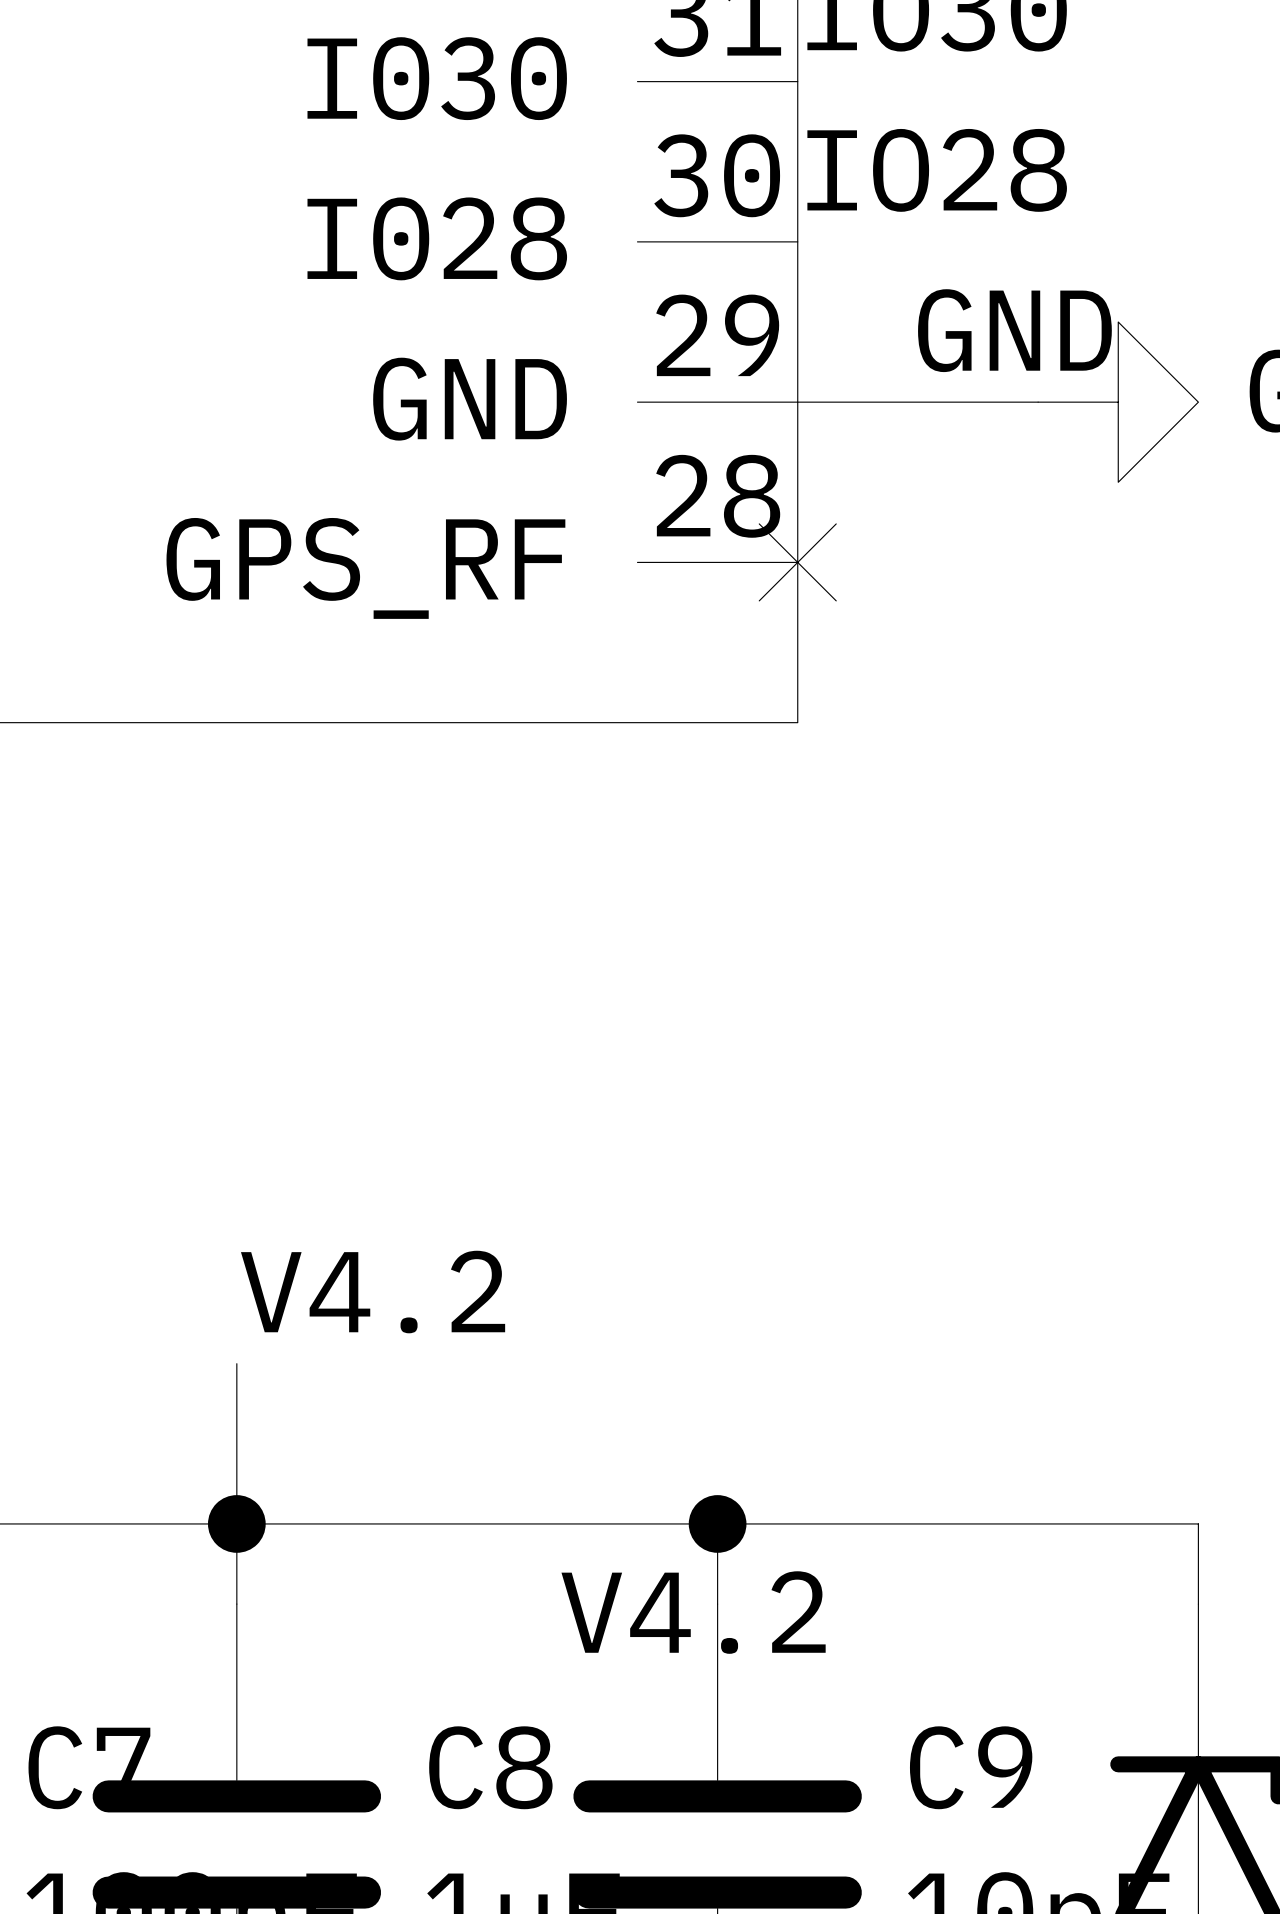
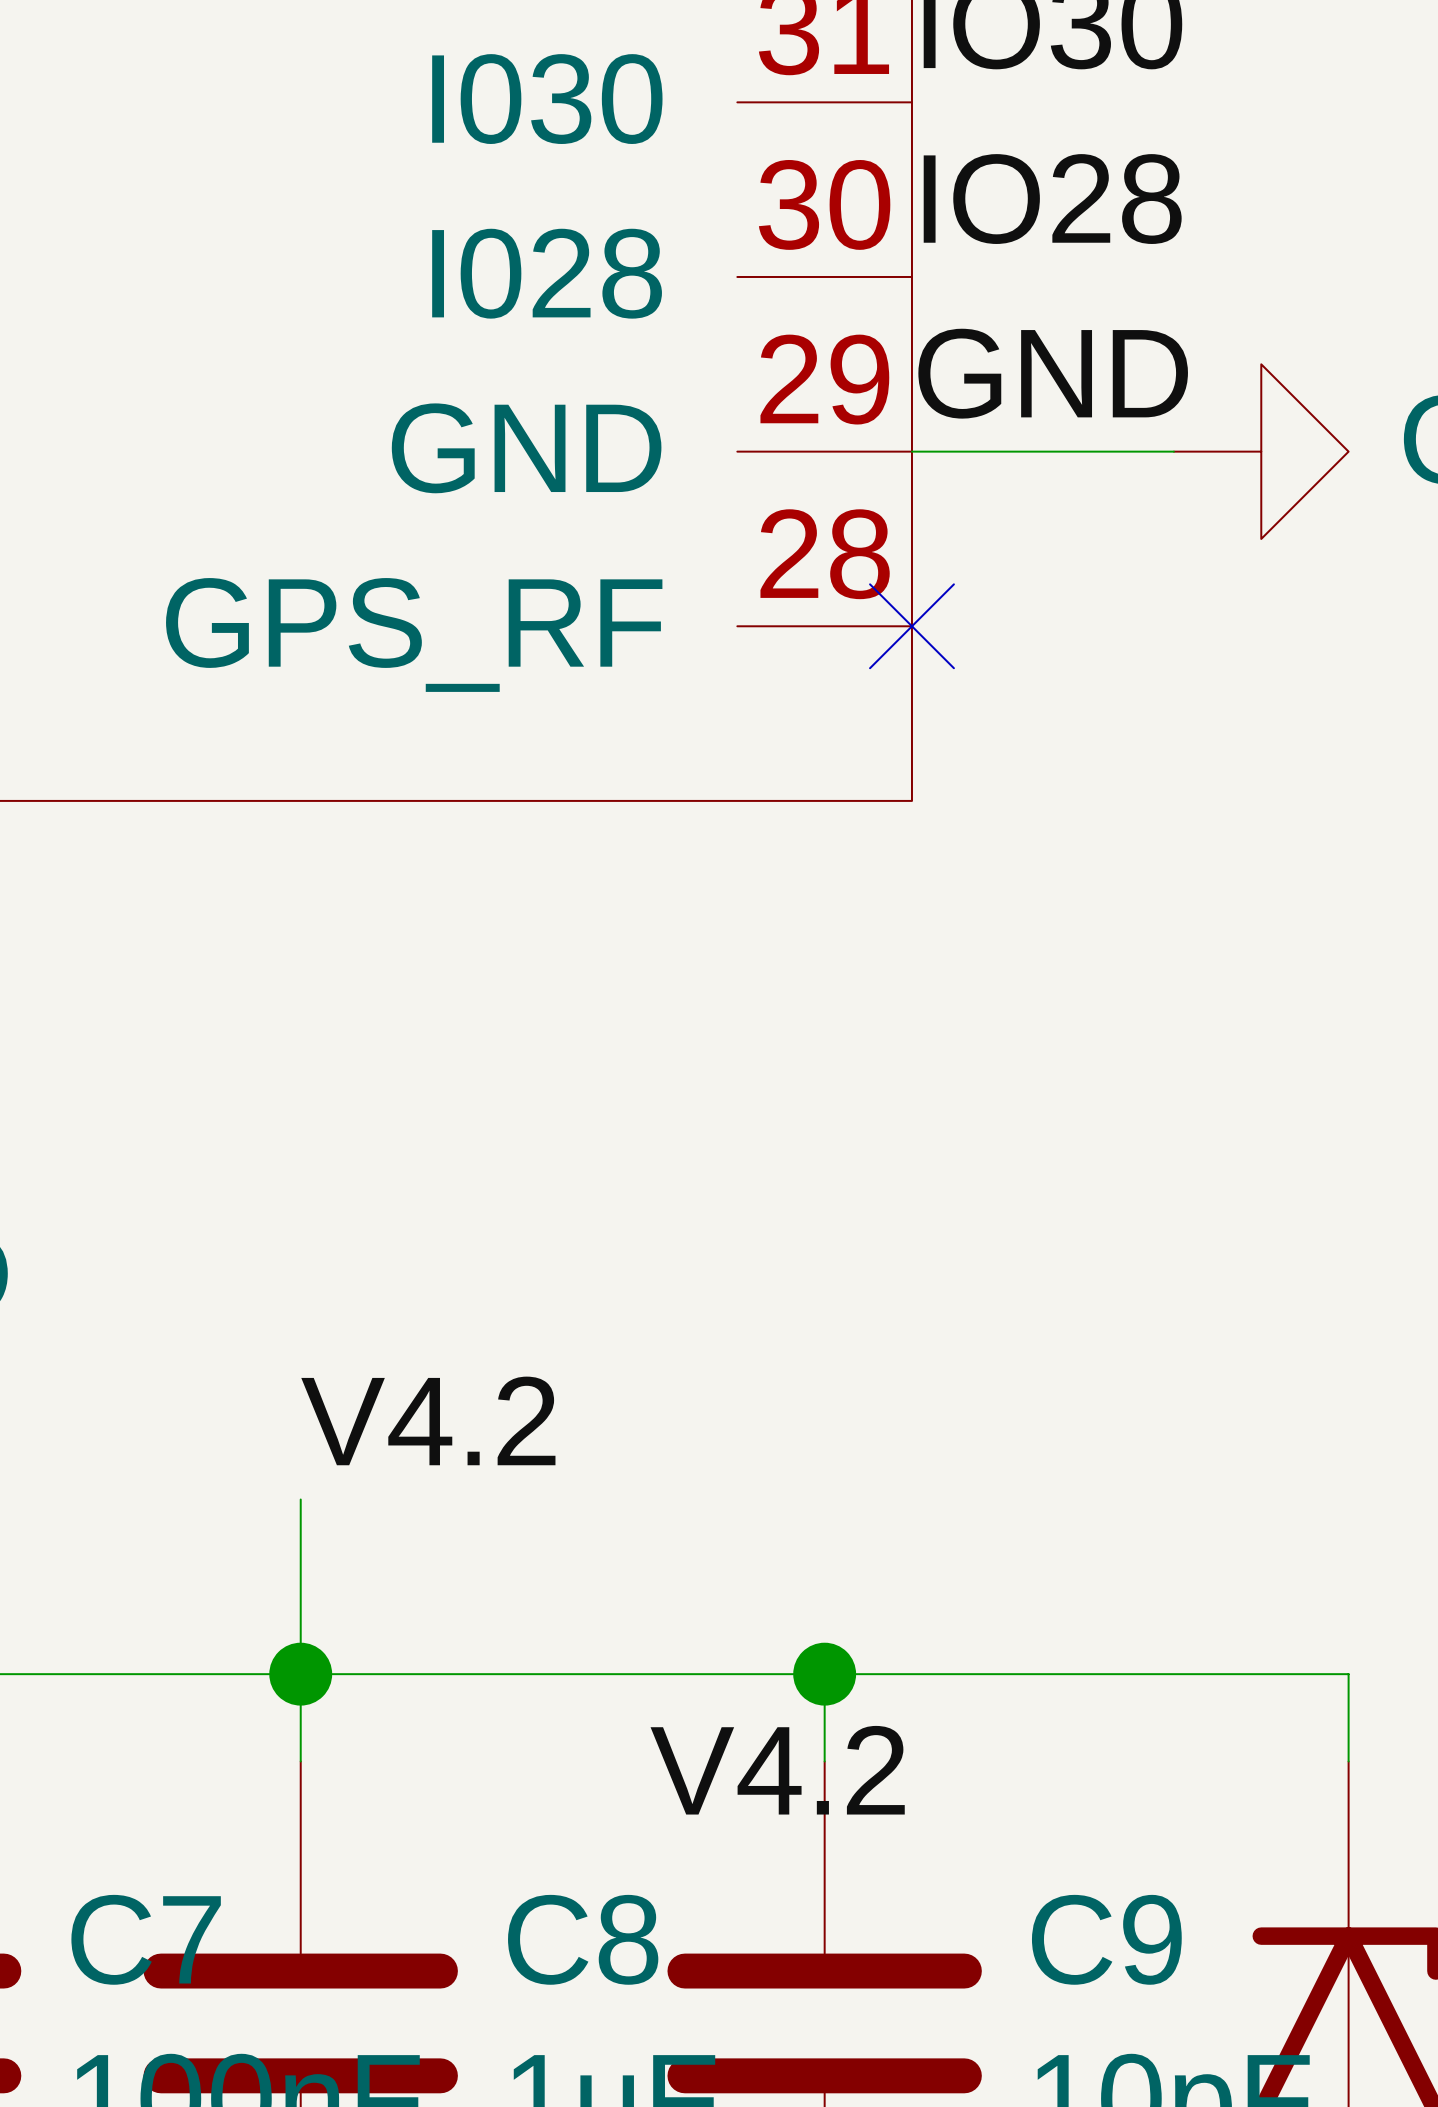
label position: GND (1014, 330) -> GND (1053, 373)

